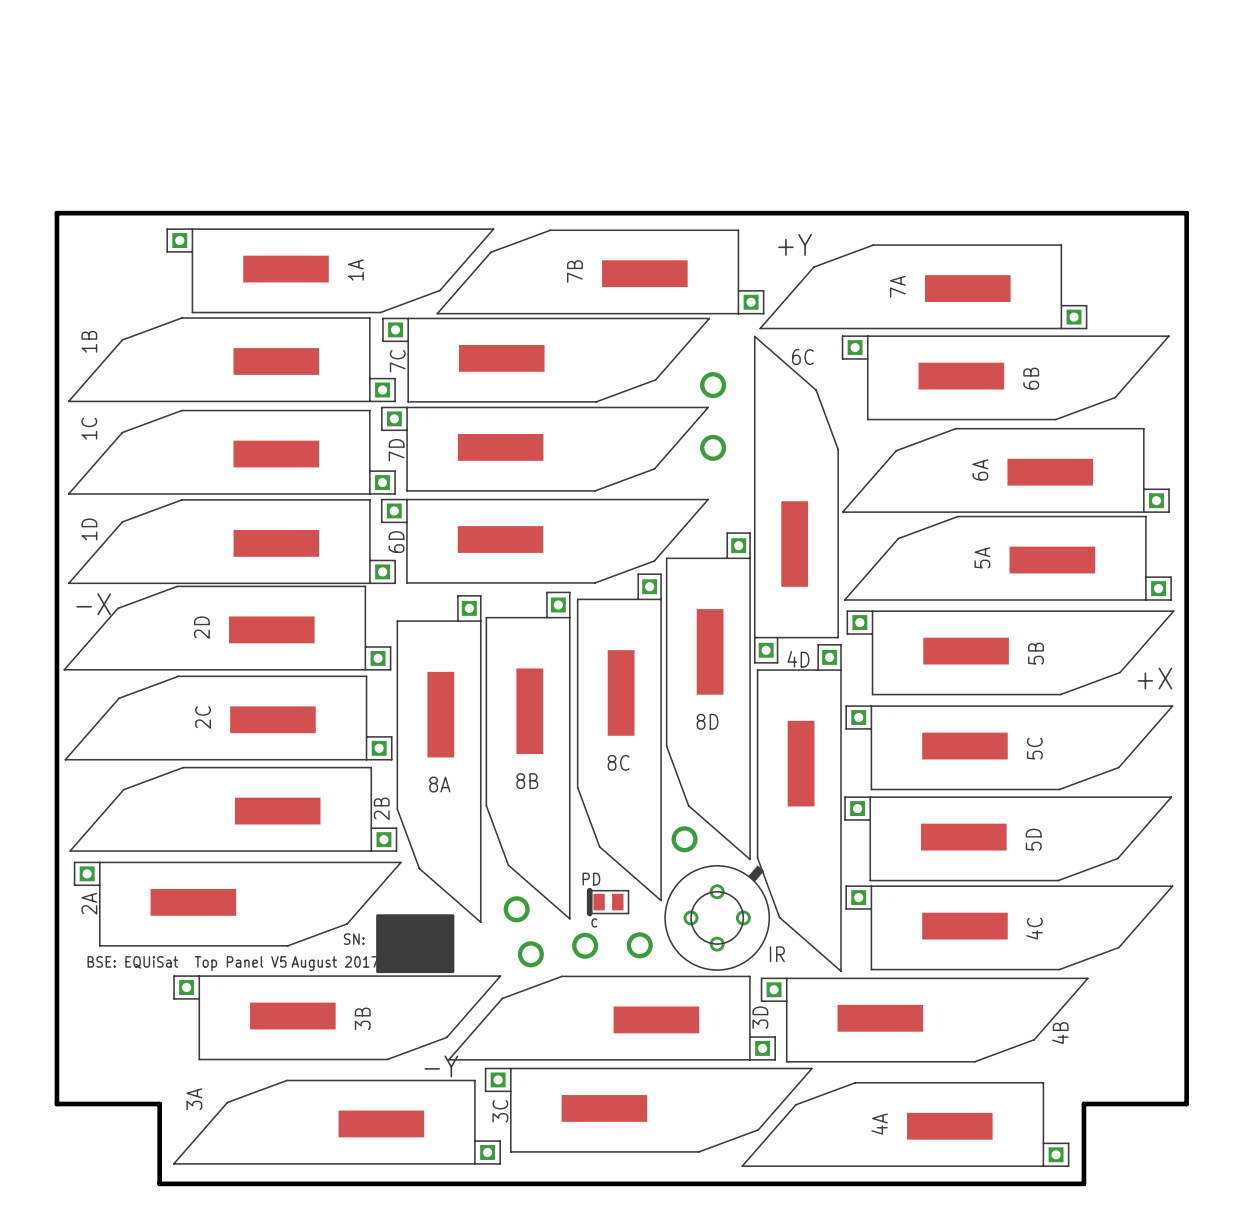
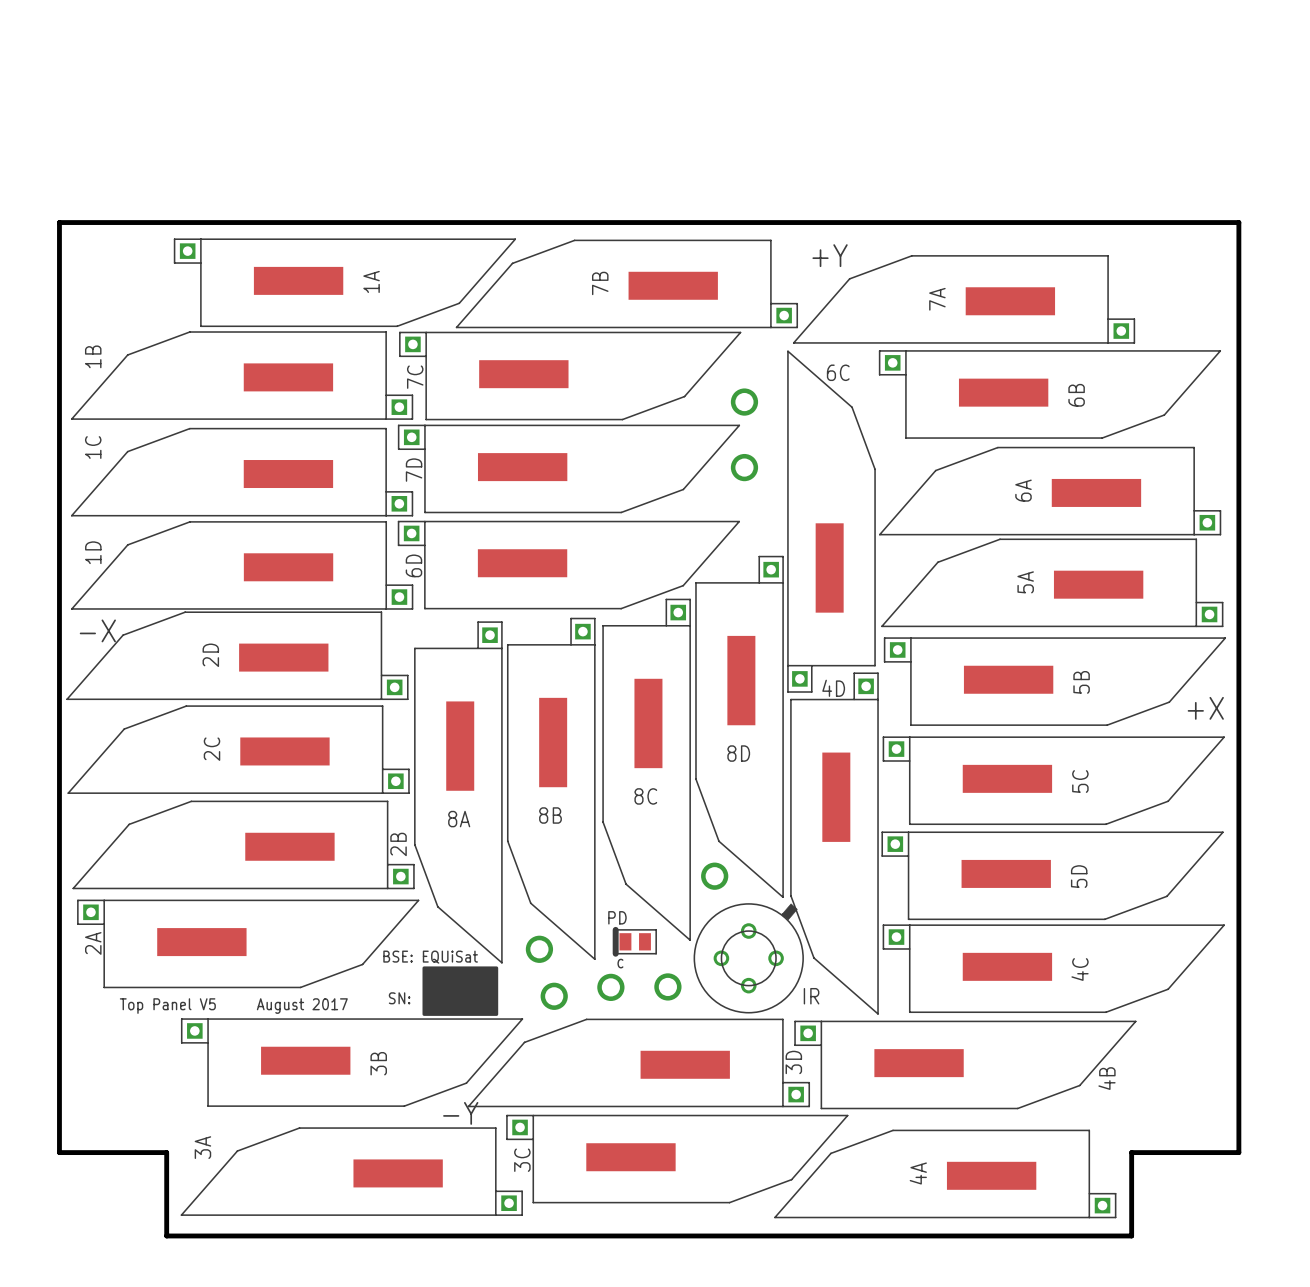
drawing: [376, 914, 455, 974] -> none
drawing: none -> [422, 966, 499, 1016]
text position: SN: (354, 939) -> SN: (399, 998)
text position: BSE: EQUiSat (132, 962) -> BSE: EQUiSat (430, 957)
text position: Top Panel V5 (240, 963) -> Top Panel V5 (167, 1006)
text position: August 2017 (335, 963) -> August 2017 (302, 1006)

